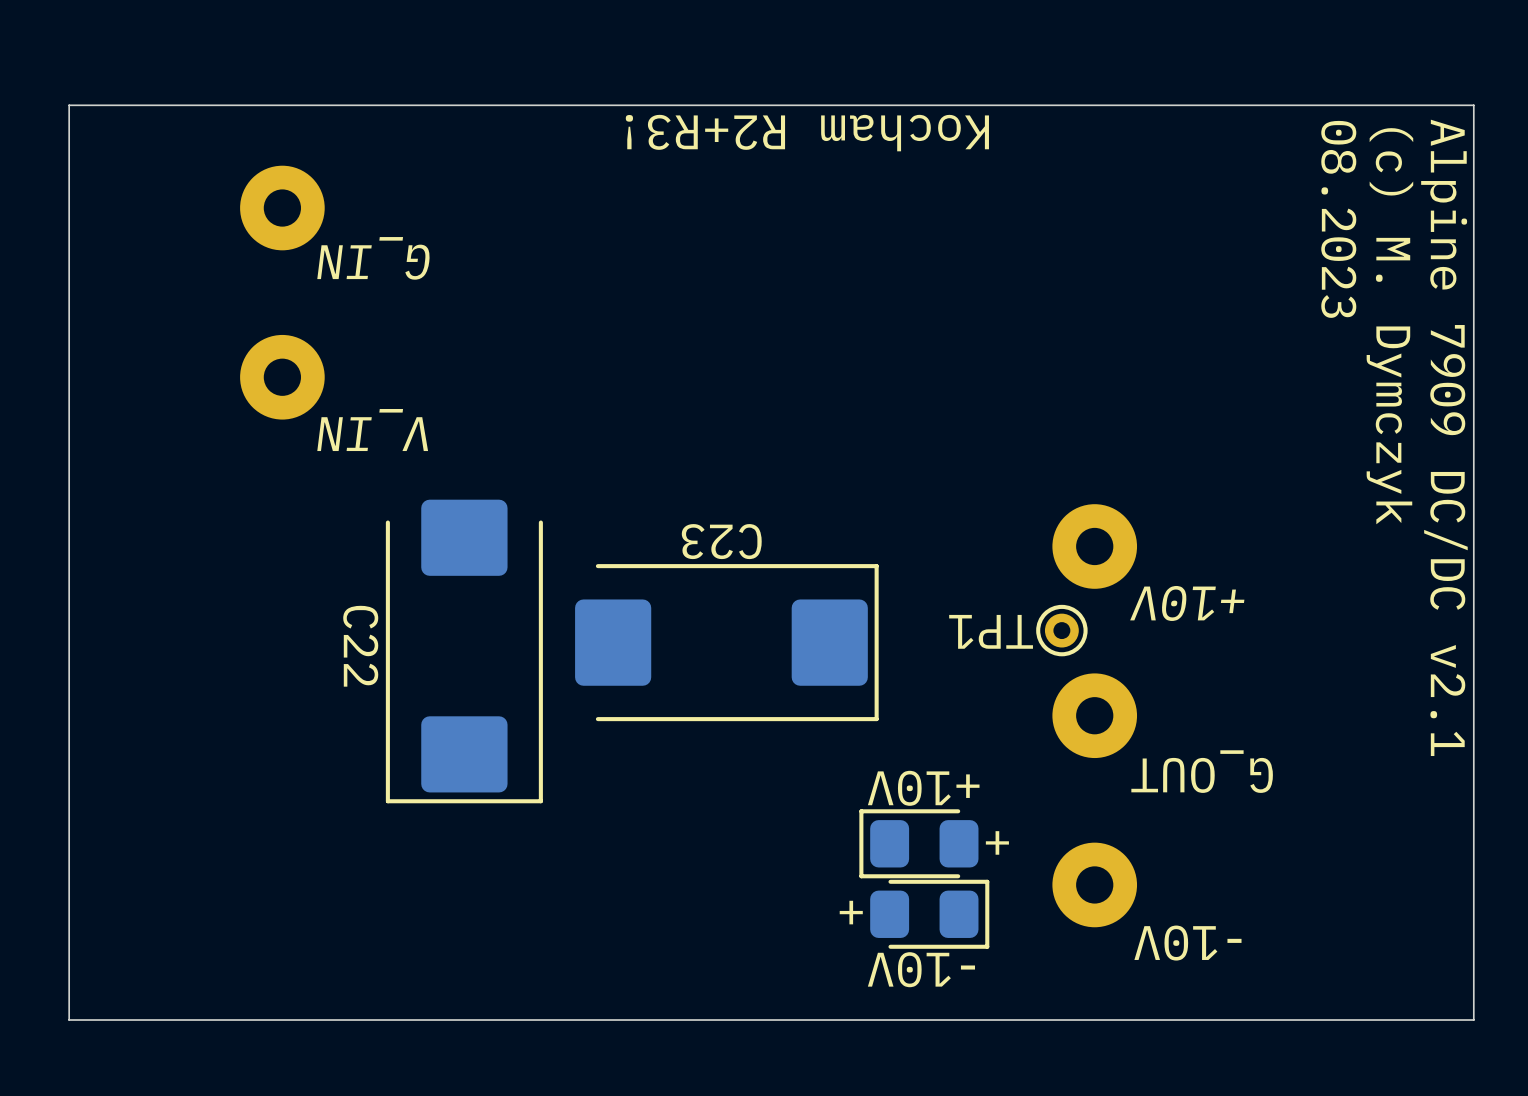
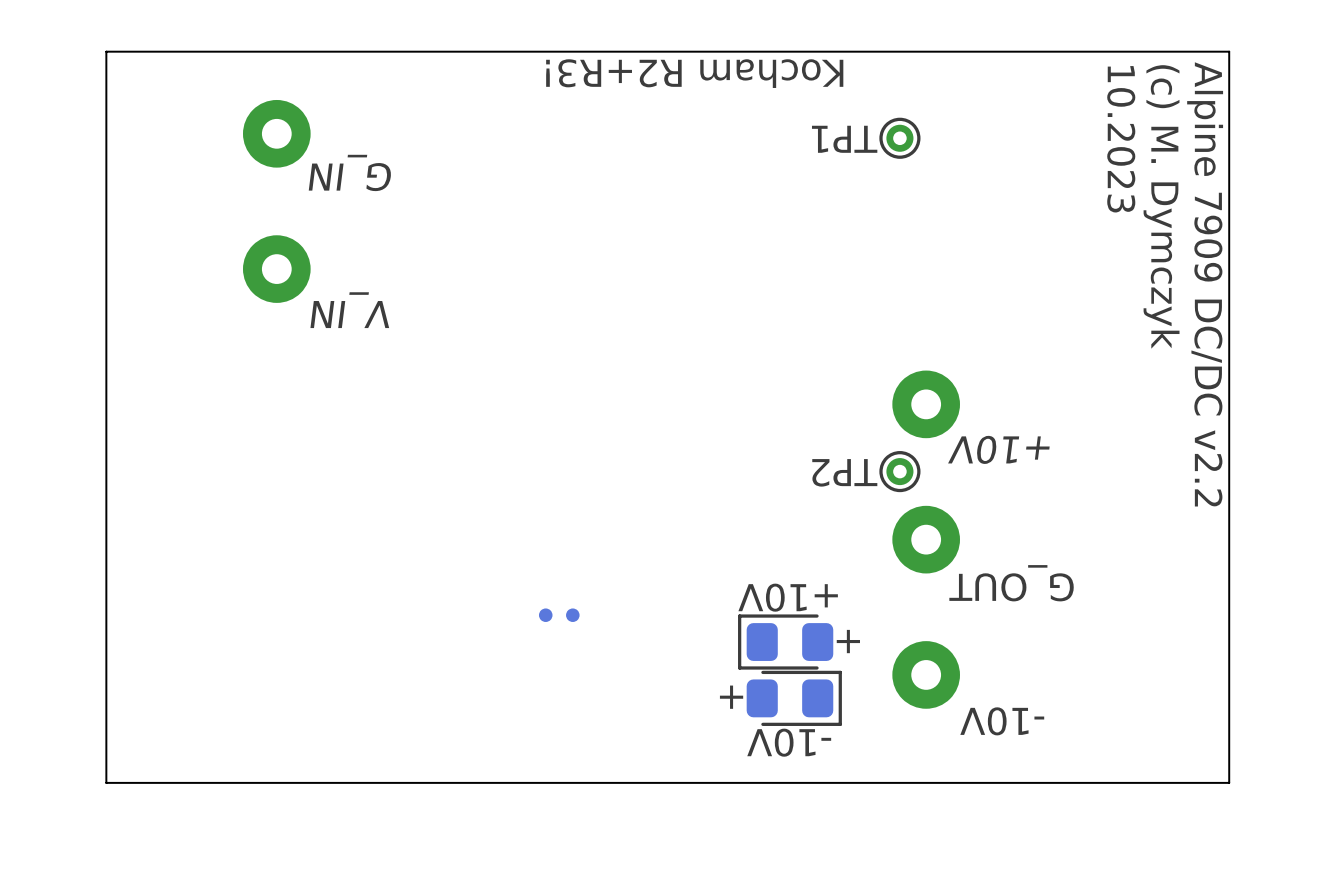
TP1: none -> (899, 138)
text: 08.2023 (1338, 219) -> 10.2023 (1121, 139)
text: Alpine 7909 DC/DC v2.1 (1444, 437) -> Alpine 7909 DC/DC v2.2 (1205, 284)
TP1 name: TP1 (991, 631) -> TP2 (844, 472)
C23: (726, 642) -> none
C22: (464, 651) -> none
part: none -> (559, 615)

